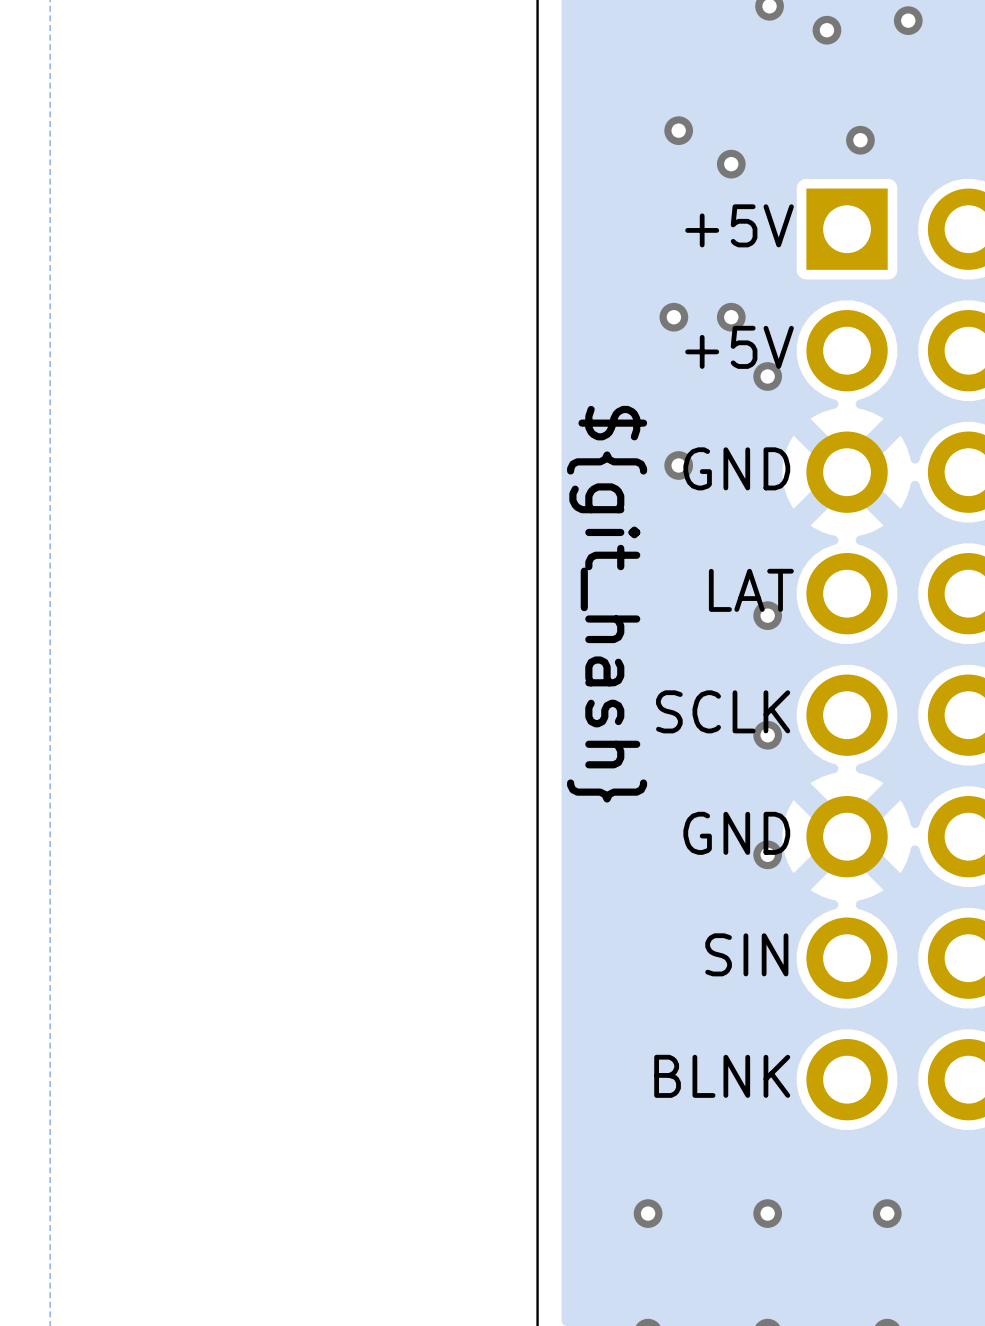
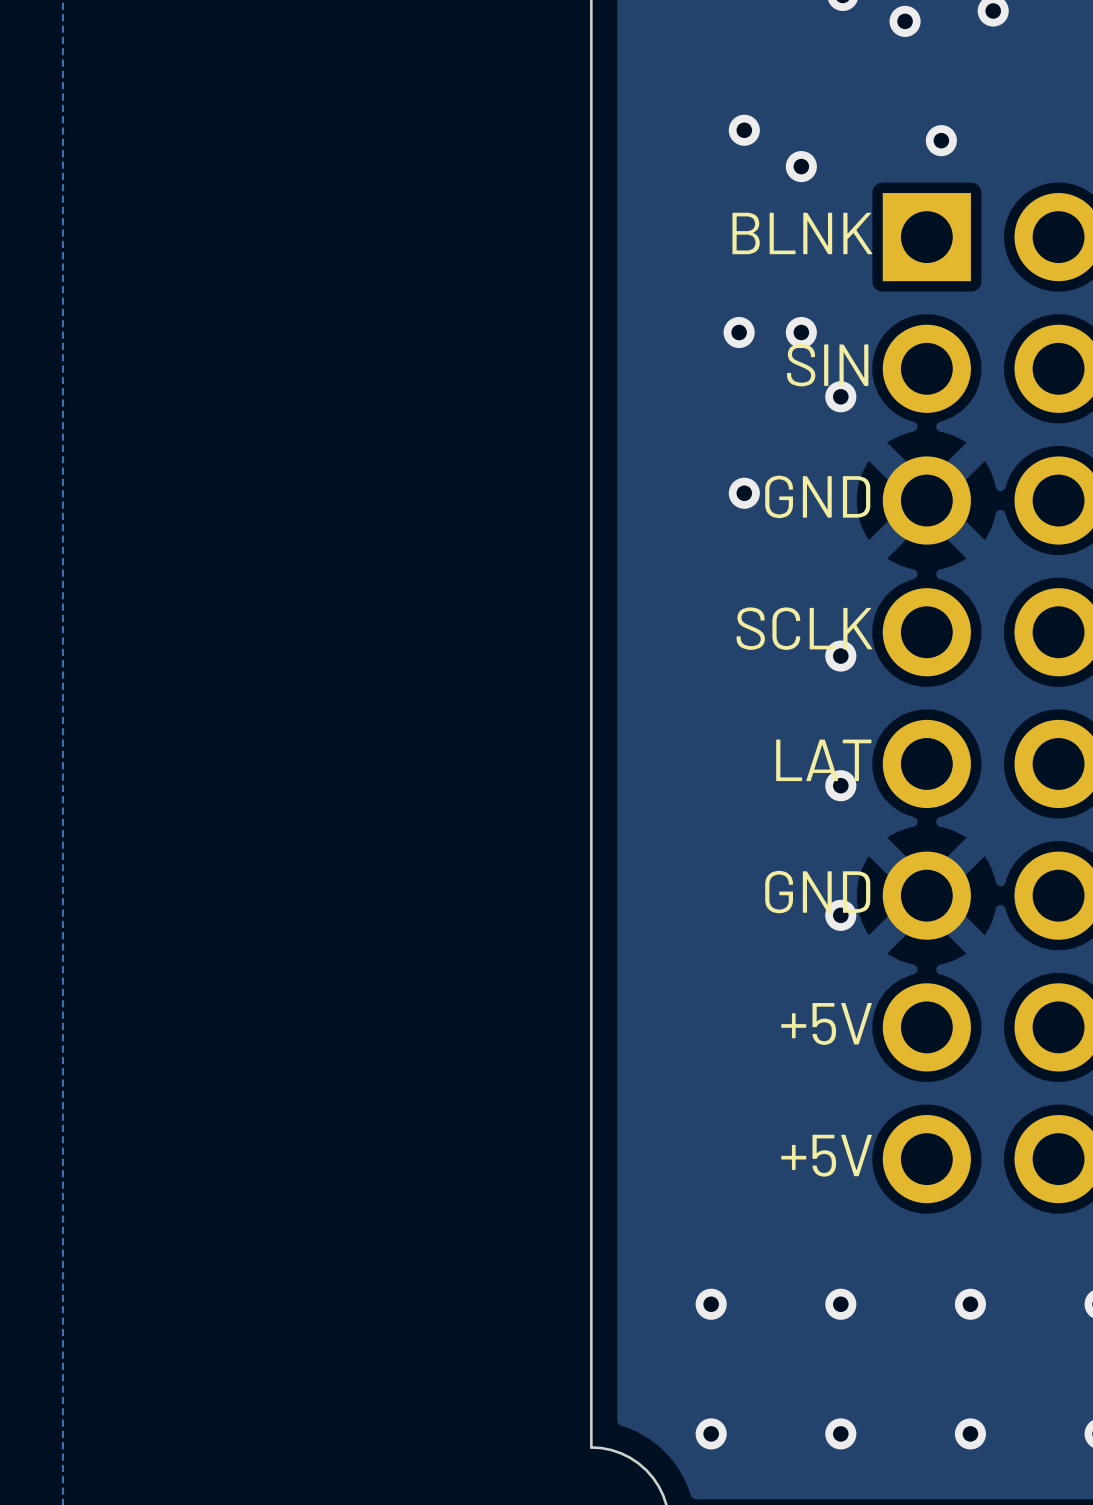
text: +5V (739, 225) -> BLNK (802, 233)
text: +5V (739, 347) -> SIN (827, 365)
text: LAT (751, 590) -> SCLK (804, 628)
text: ${git_hash} (607, 604) -> none
text: SCLK (723, 711) -> LAT (823, 760)
text: SIN (746, 954) -> +5V (826, 1023)
text: BLNK (722, 1076) -> +5V (826, 1155)

